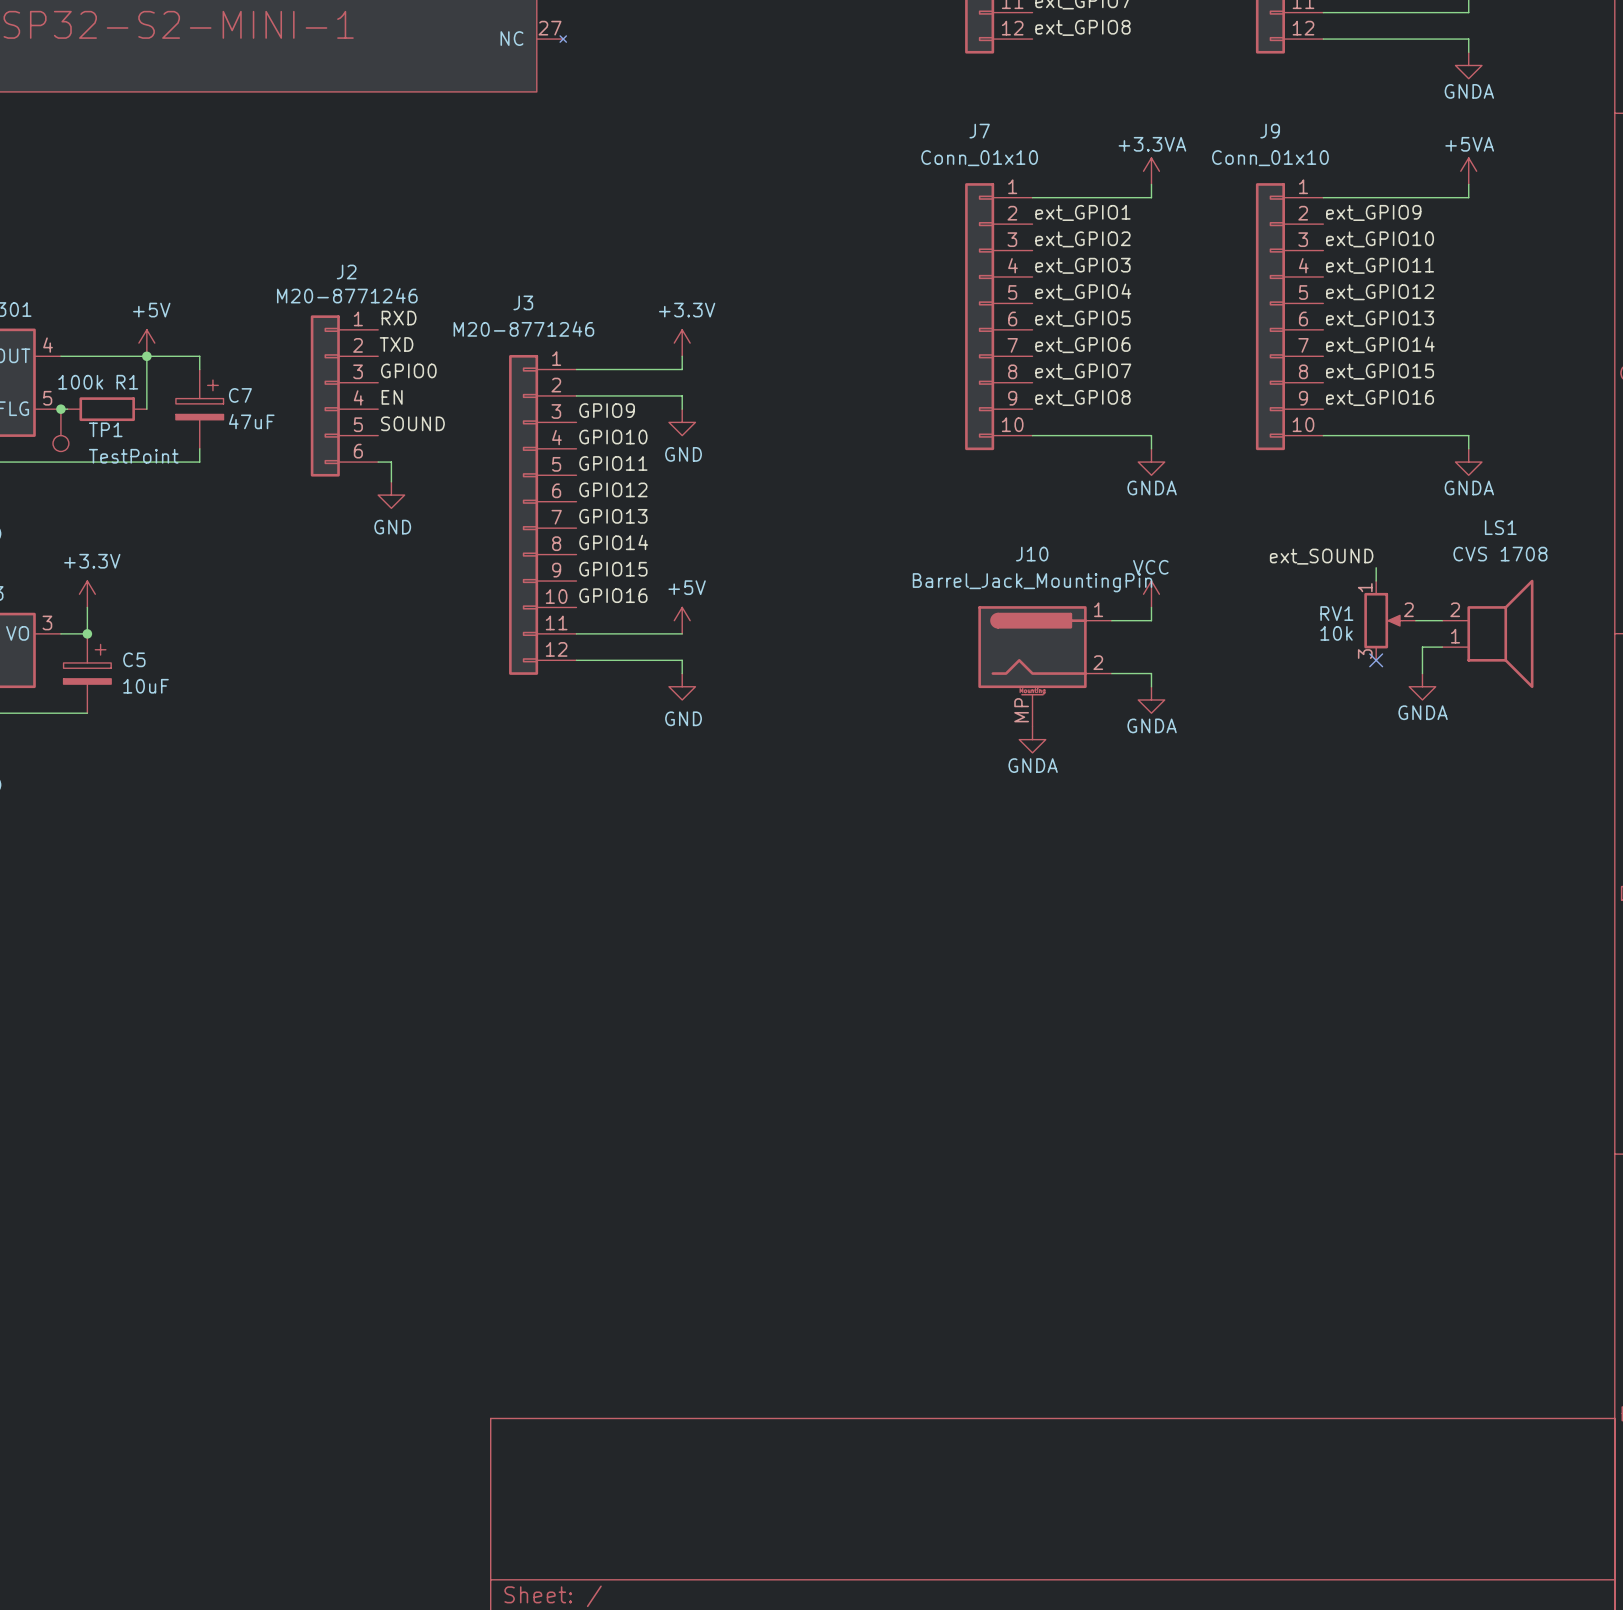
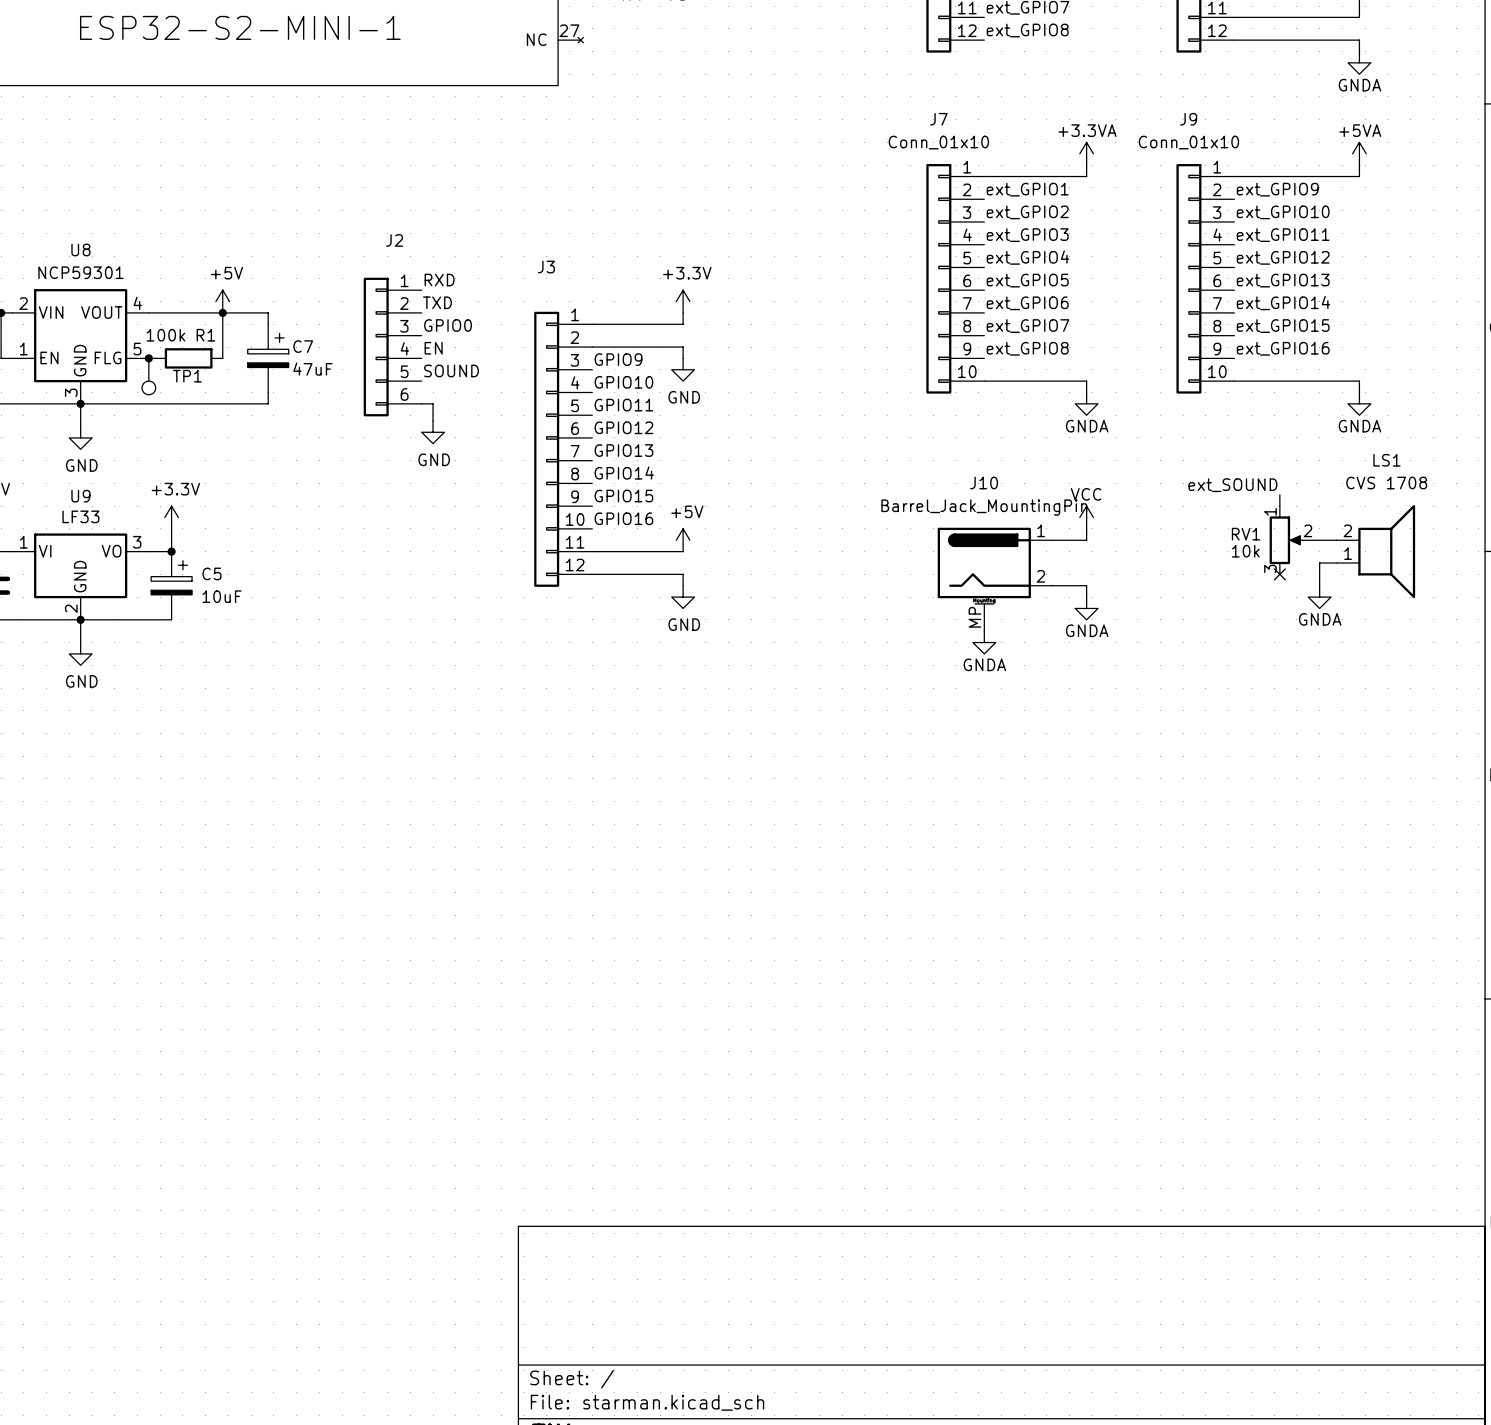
J2 value: M20-8771246 (347, 295) -> none
J3 value: M20-8771246 (523, 329) -> none
TP1 value: TestPoint (133, 456) -> none

